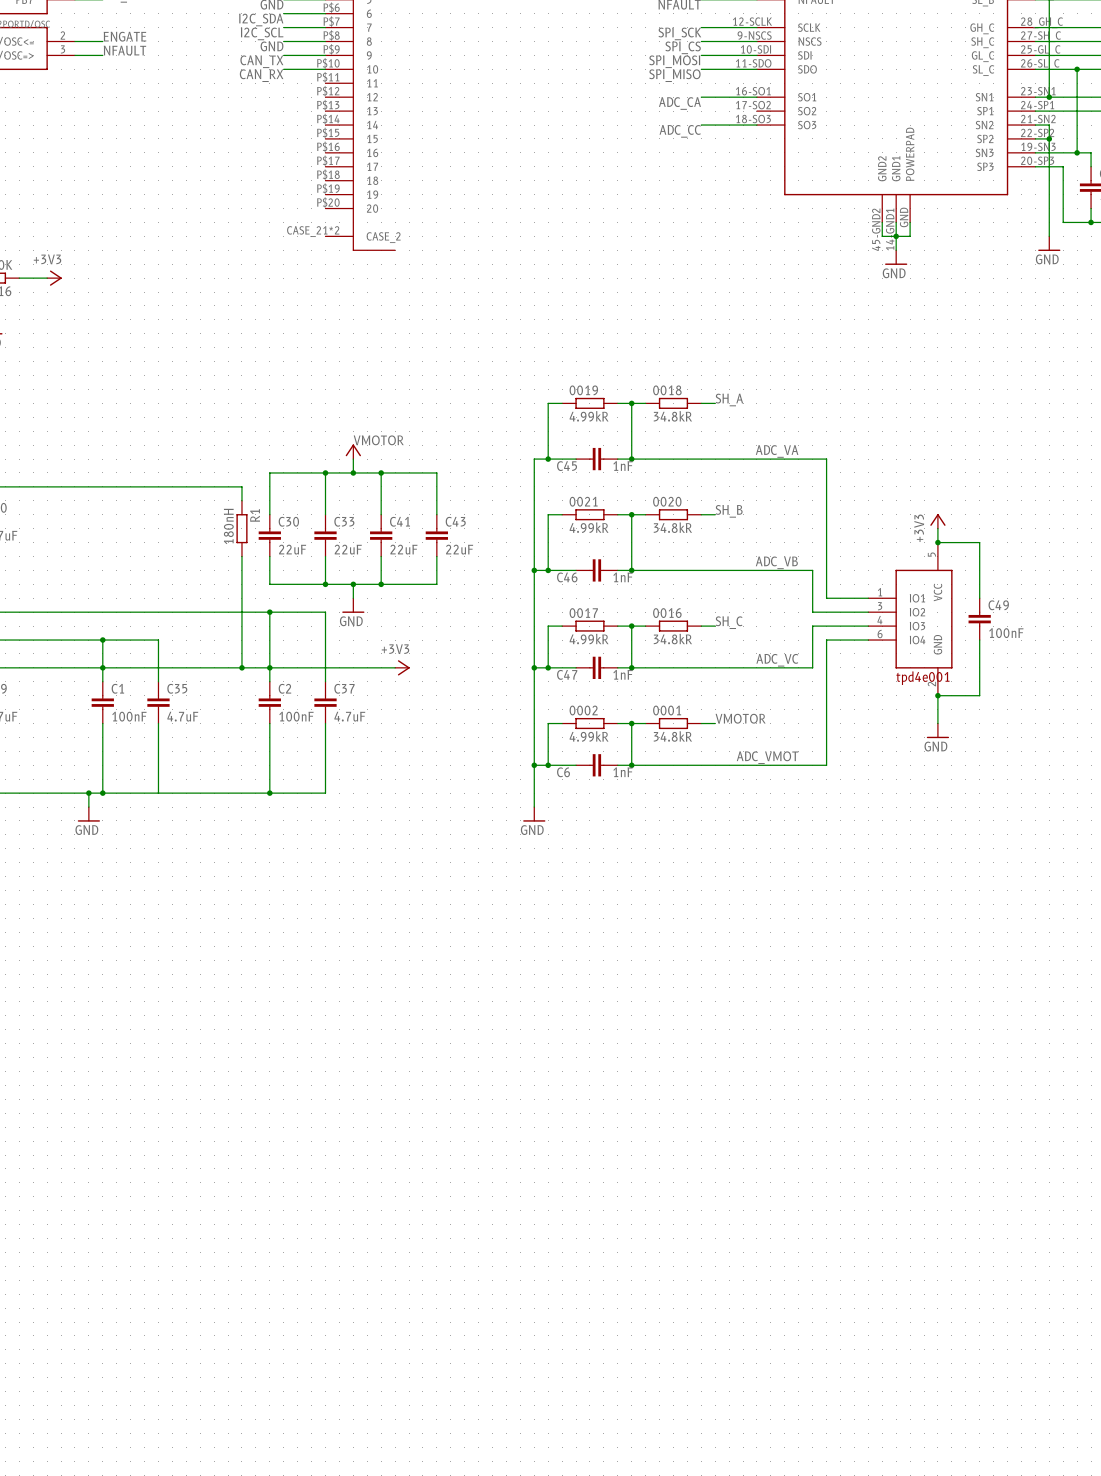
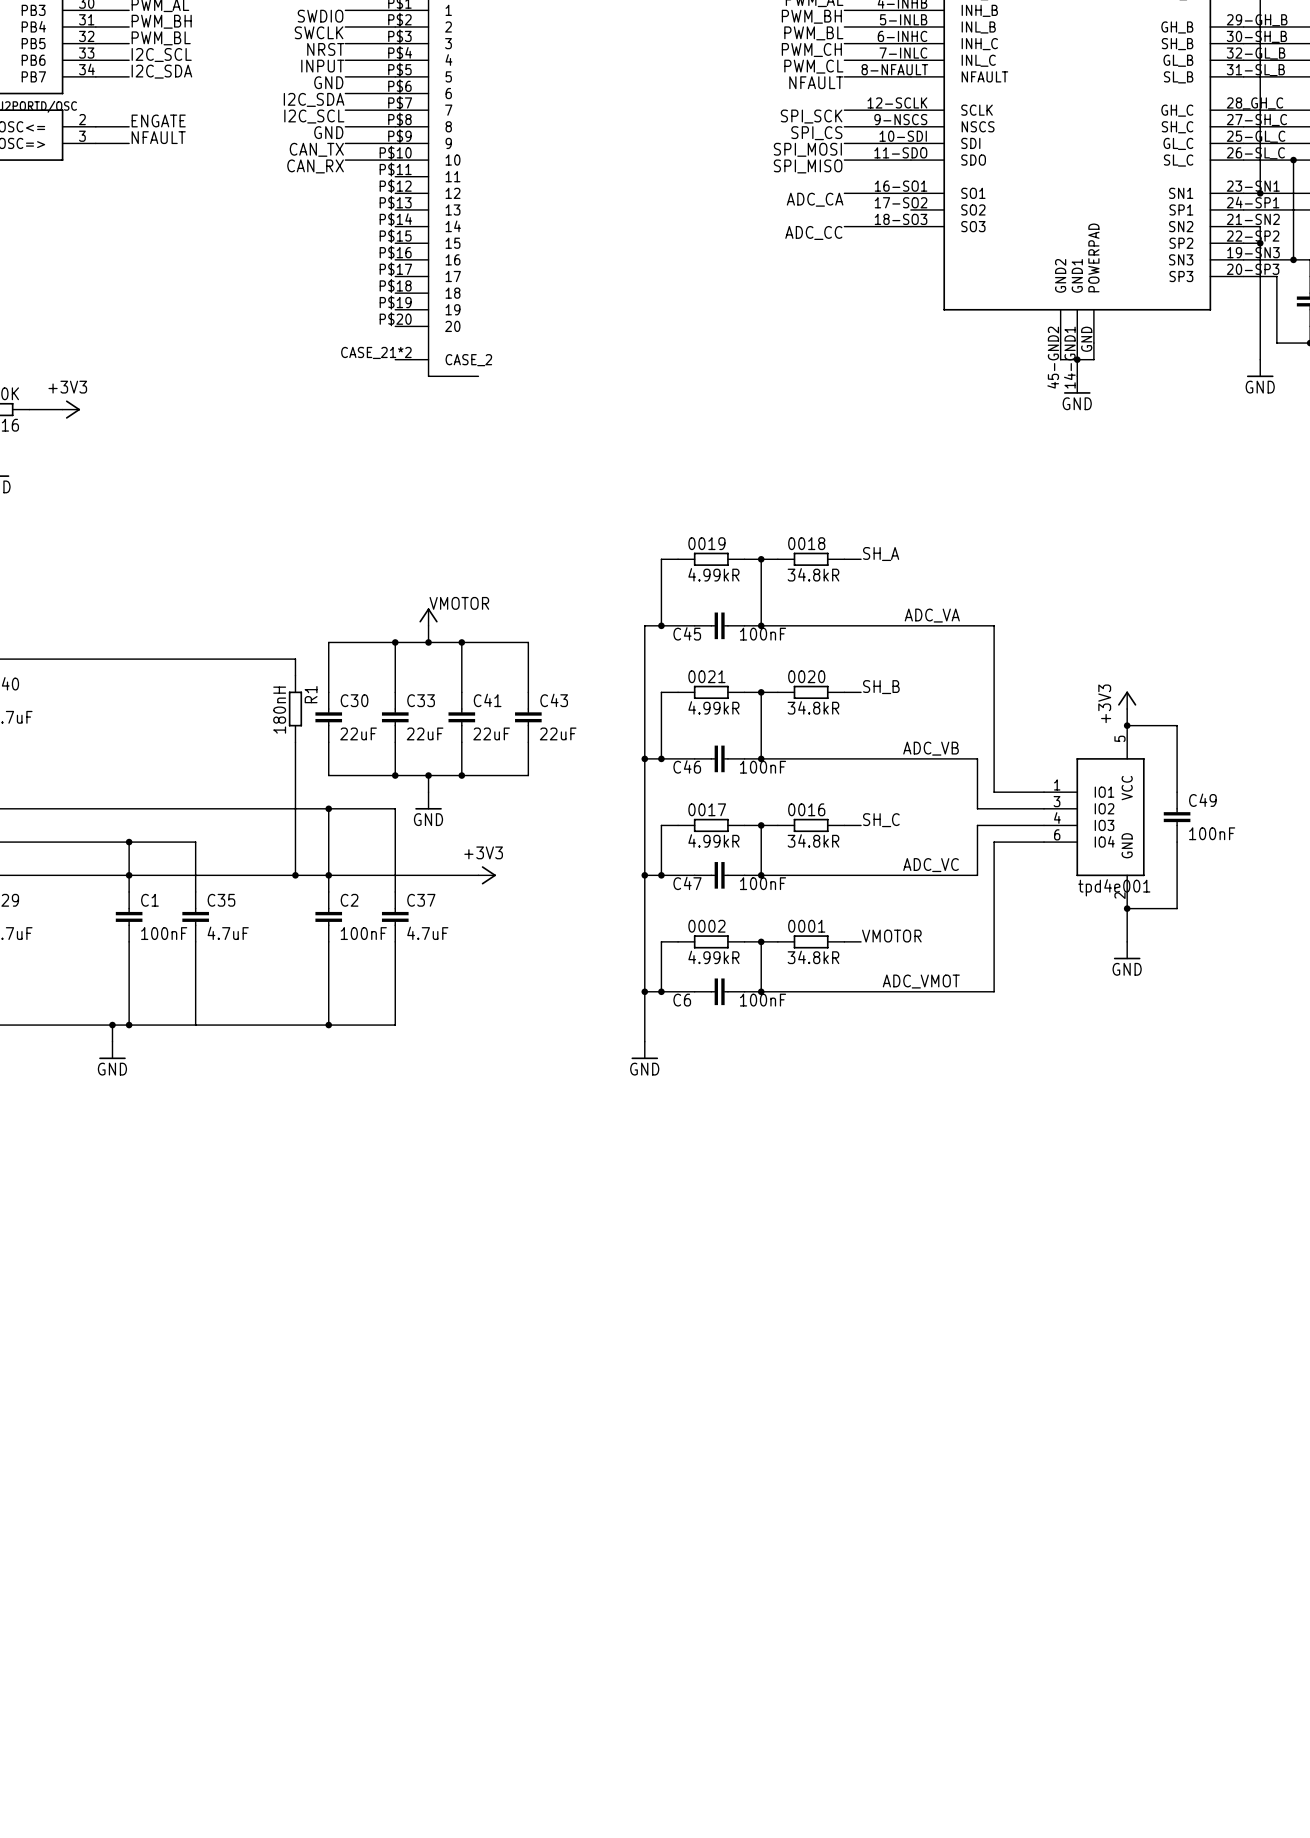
C45 value: 1nF (623, 466) -> 100nF (763, 634)
C46 value: 1nF (623, 577) -> 100nF (763, 767)
C47 value: 1nF (623, 674) -> 100nF (763, 883)
C6 value: 1nF (623, 772) -> 100nF (763, 1000)

